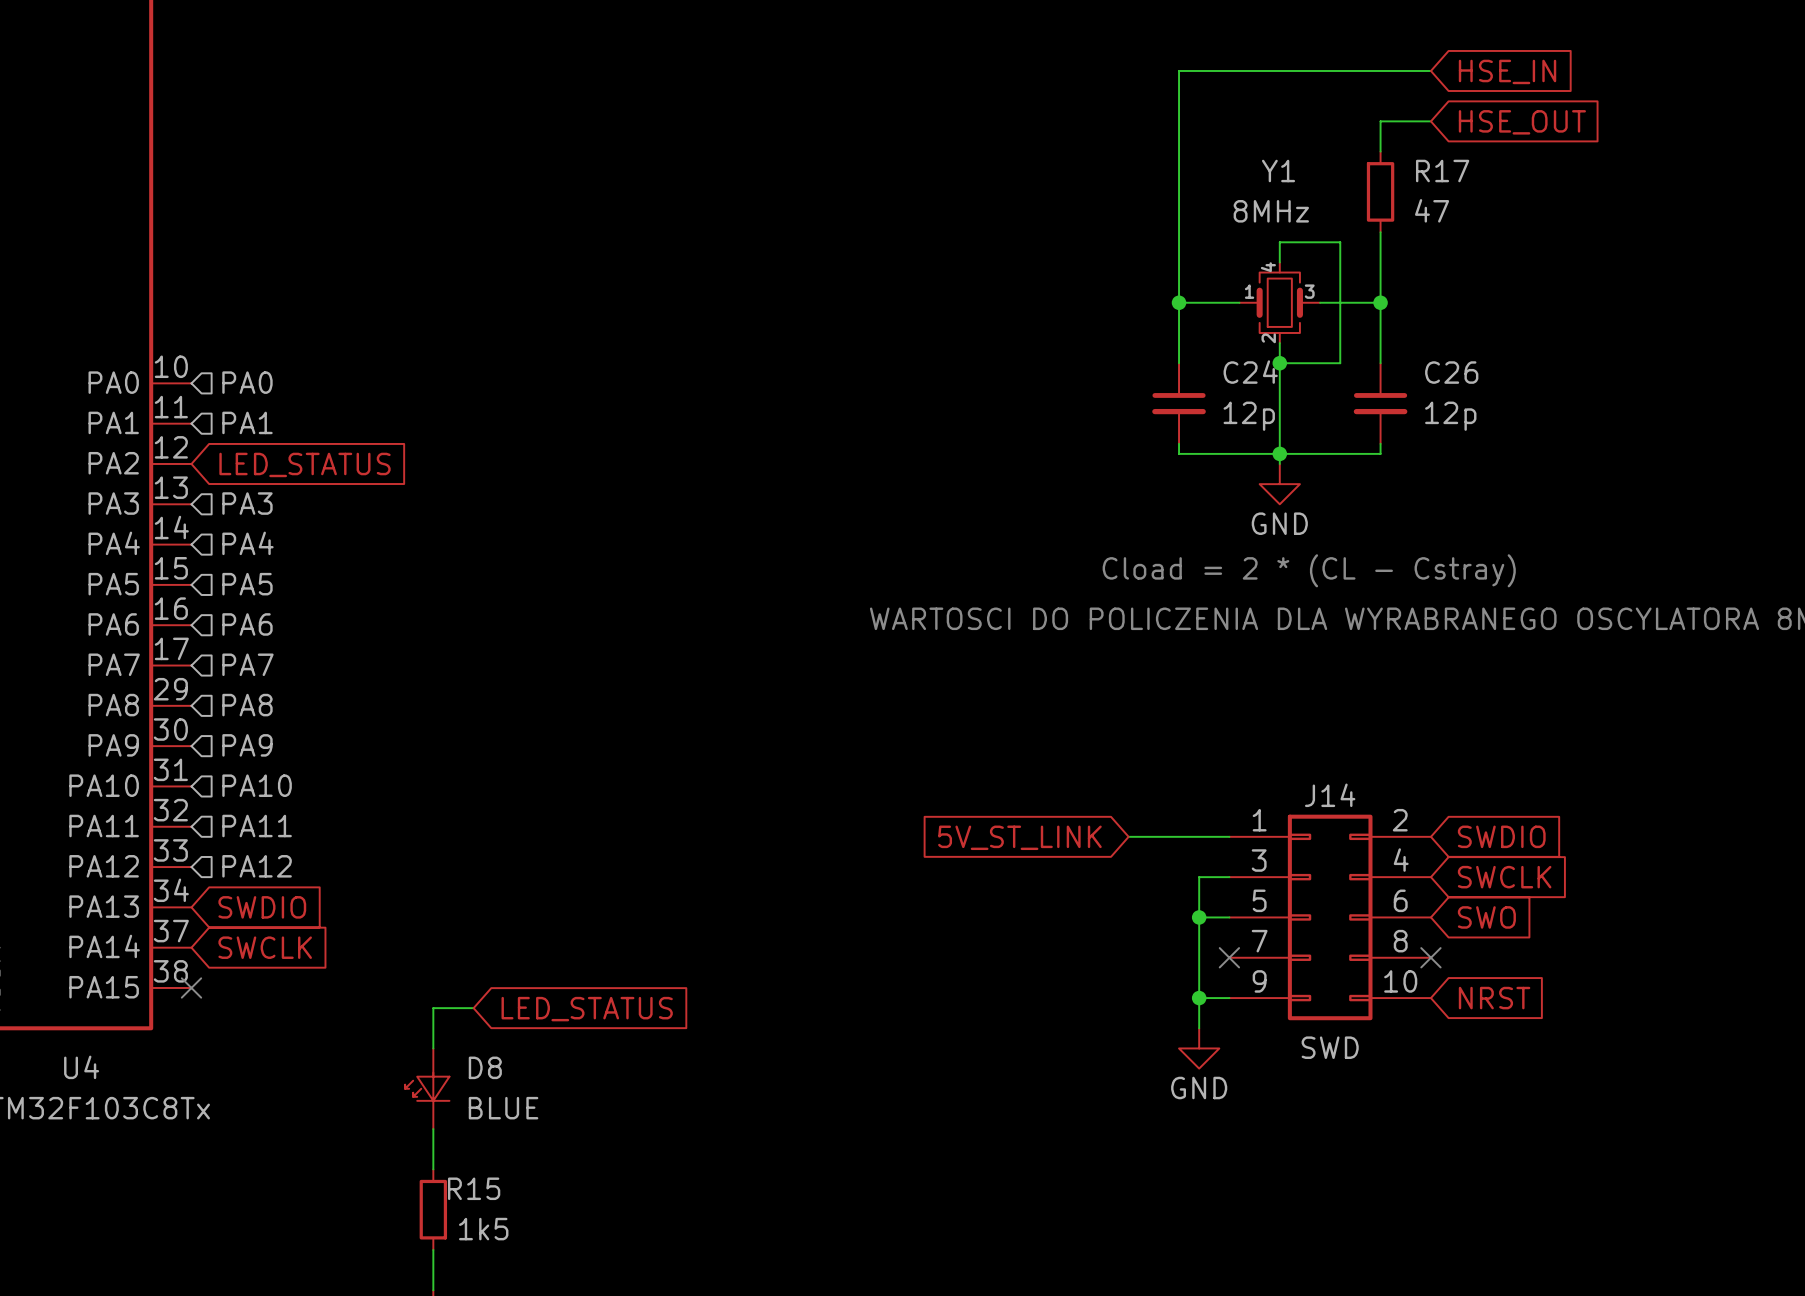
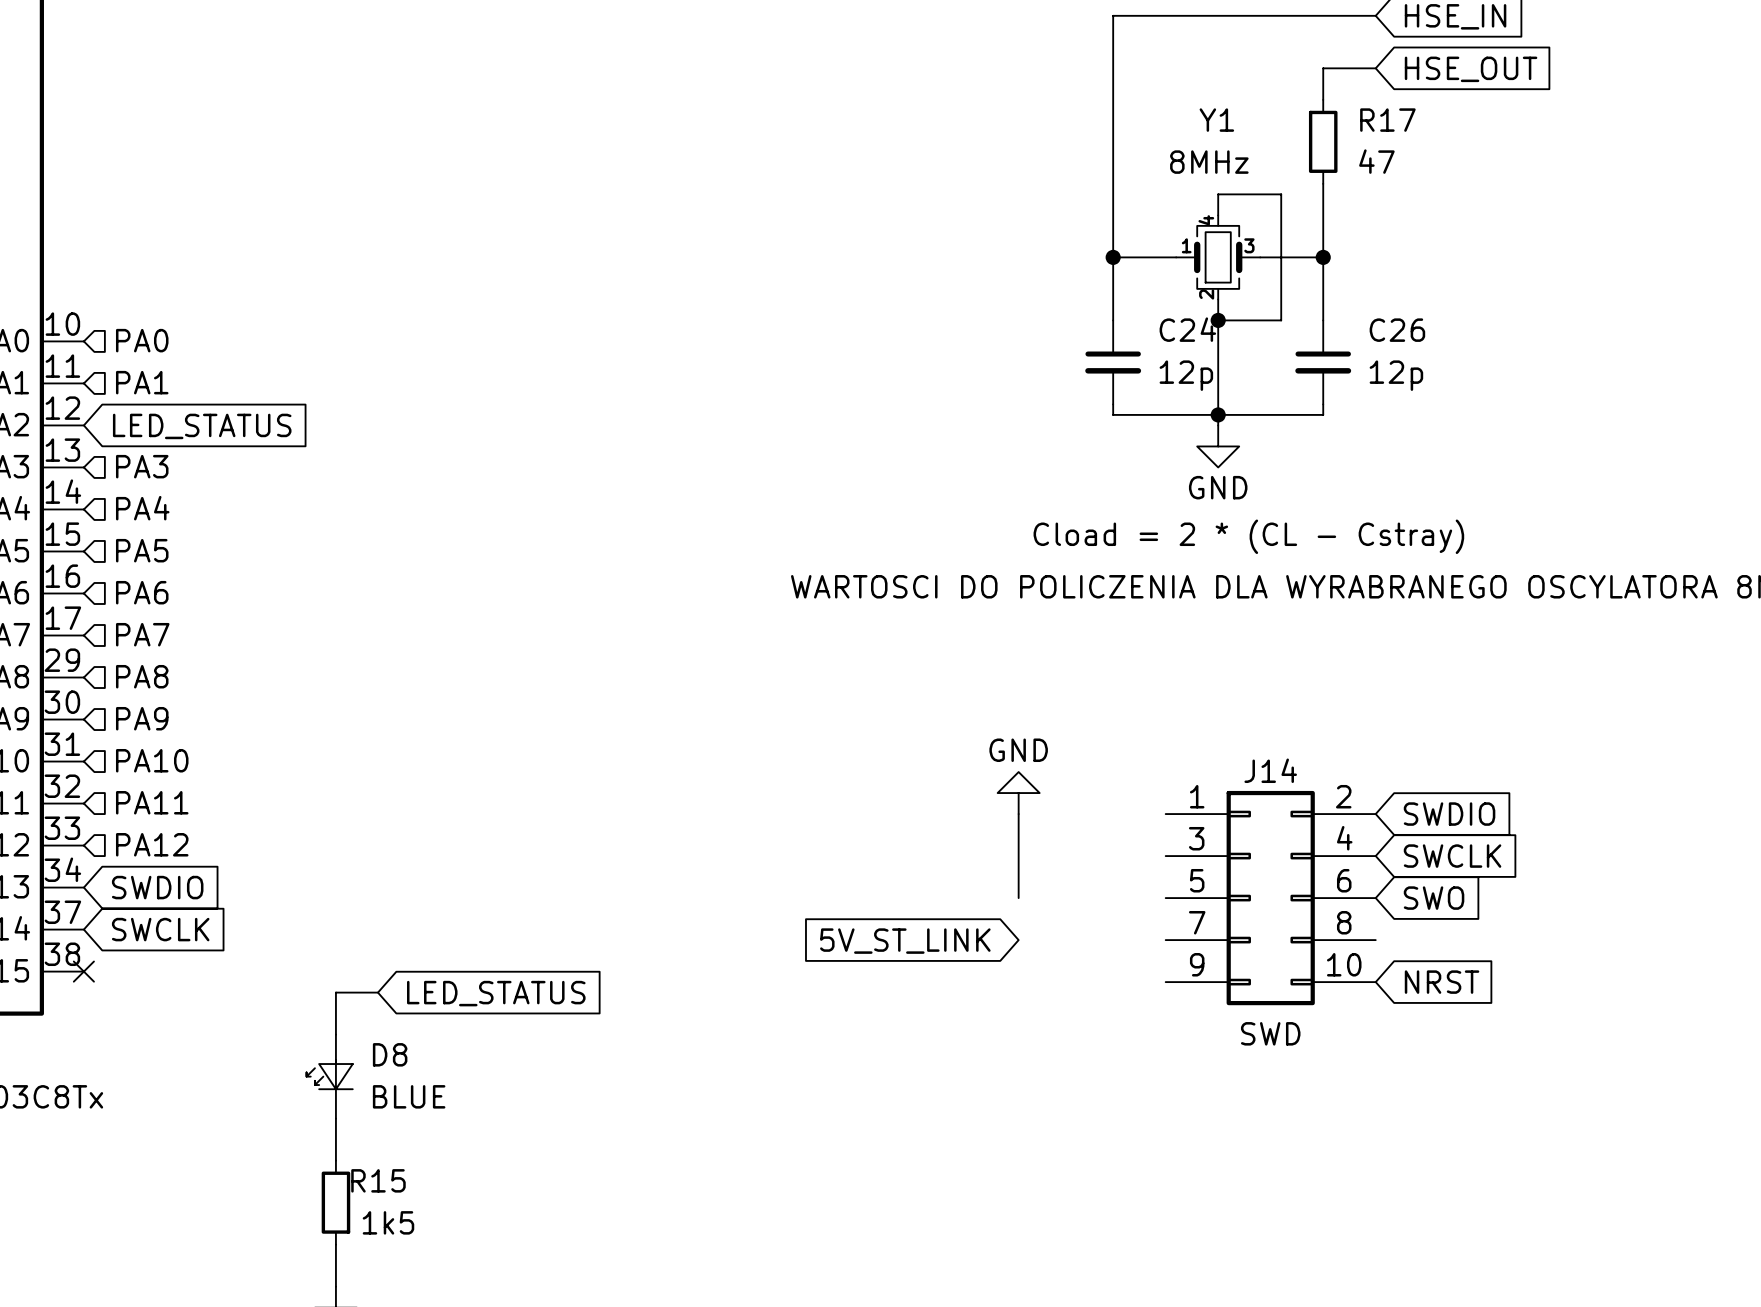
wire: none -> (1018, 814) (1018, 898)
wire: (1128, 836) (1229, 836) -> none
global label position: 5V_ST_LINK (1019, 837) -> 5V_ST_LINK (905, 941)
wire: (1229, 877) (1199, 877) (1199, 1028) -> none
wire: (1199, 917) (1229, 917) -> none
junction: (1199, 917) -> none
no-connect mark: (1229, 957) -> none
no-connect mark: (1430, 957) -> none
wire: (1199, 998) (1229, 998) -> none
junction: (1199, 998) -> none
power symbol rotation: 0° (1199, 1048) -> 180° (1018, 793)
power symbol position: GND (1199, 1048) -> GND (1018, 793)

